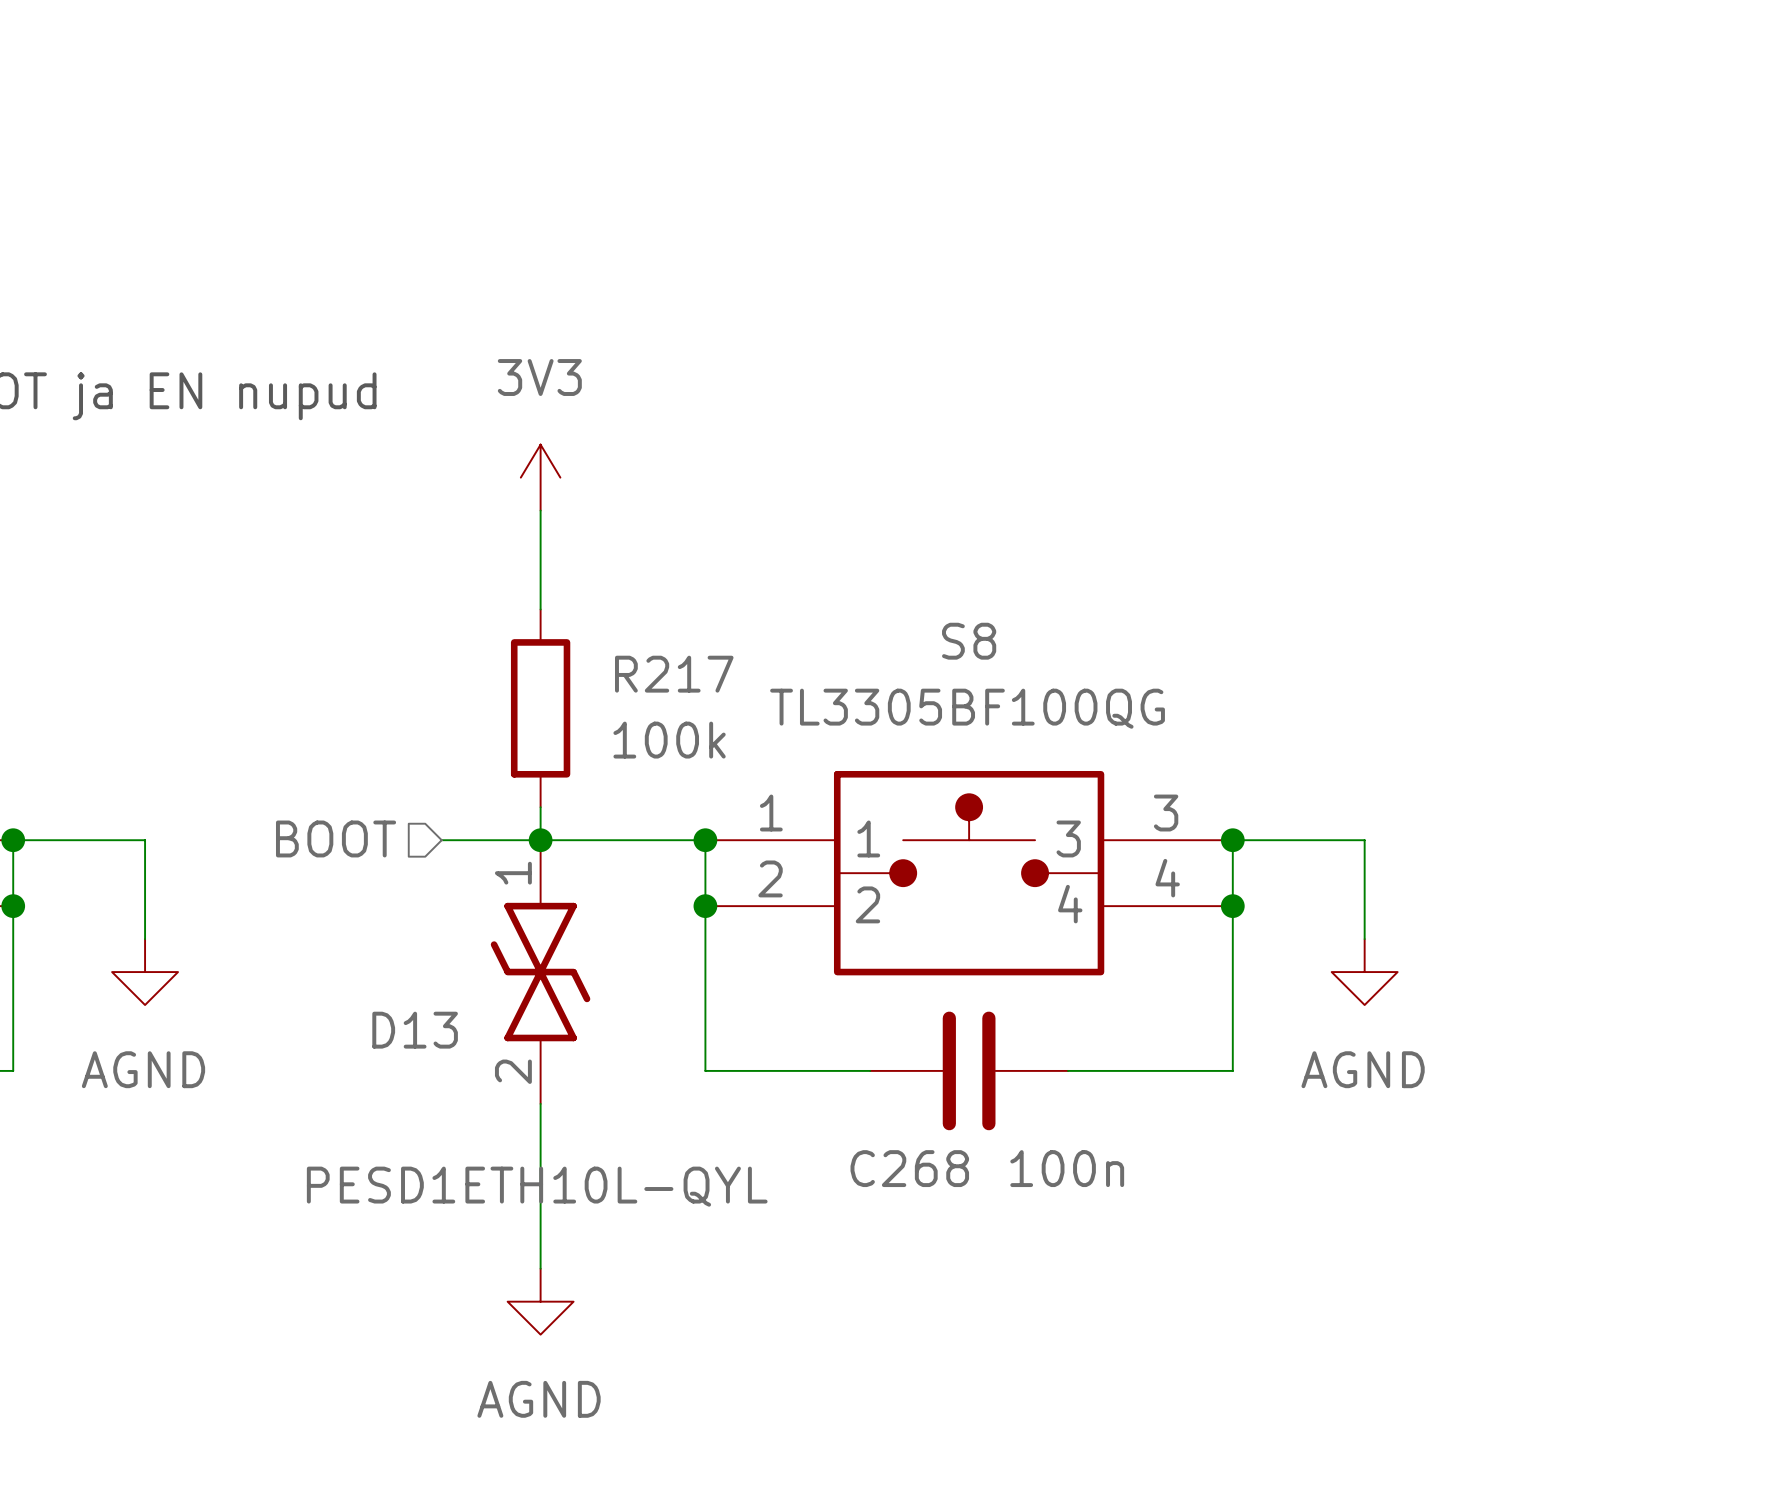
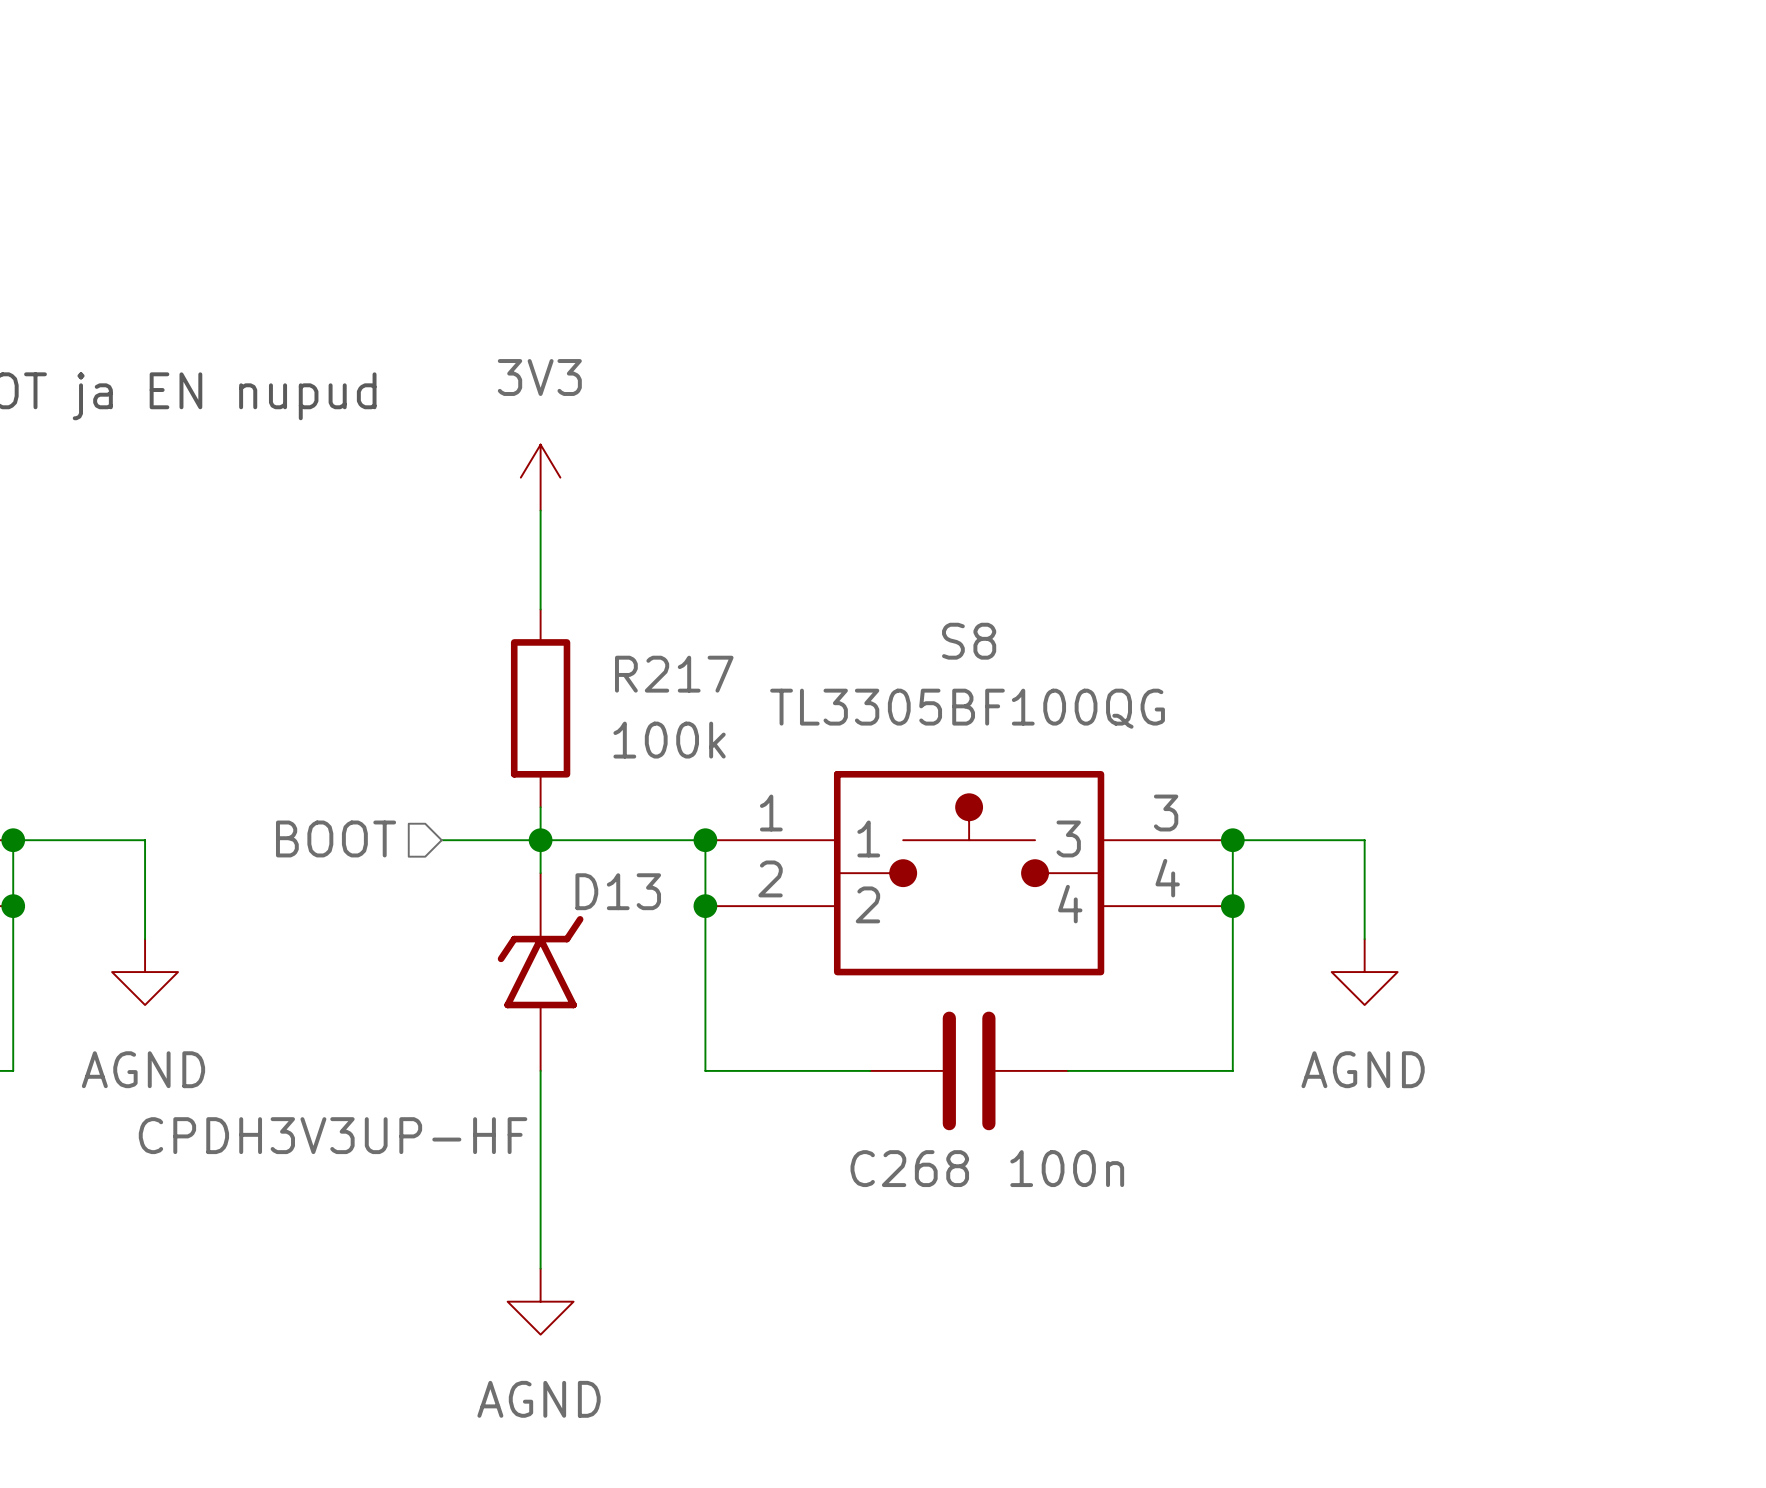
D13 symbol: [490, 840, 591, 1104] -> [497, 873, 584, 1071]
D13 name position: D13 (415, 1030) -> D13 (618, 891)
D13 value: PESD1ETH10L-QYL (537, 1186) -> CPDH3V3UP-HF (333, 1135)

